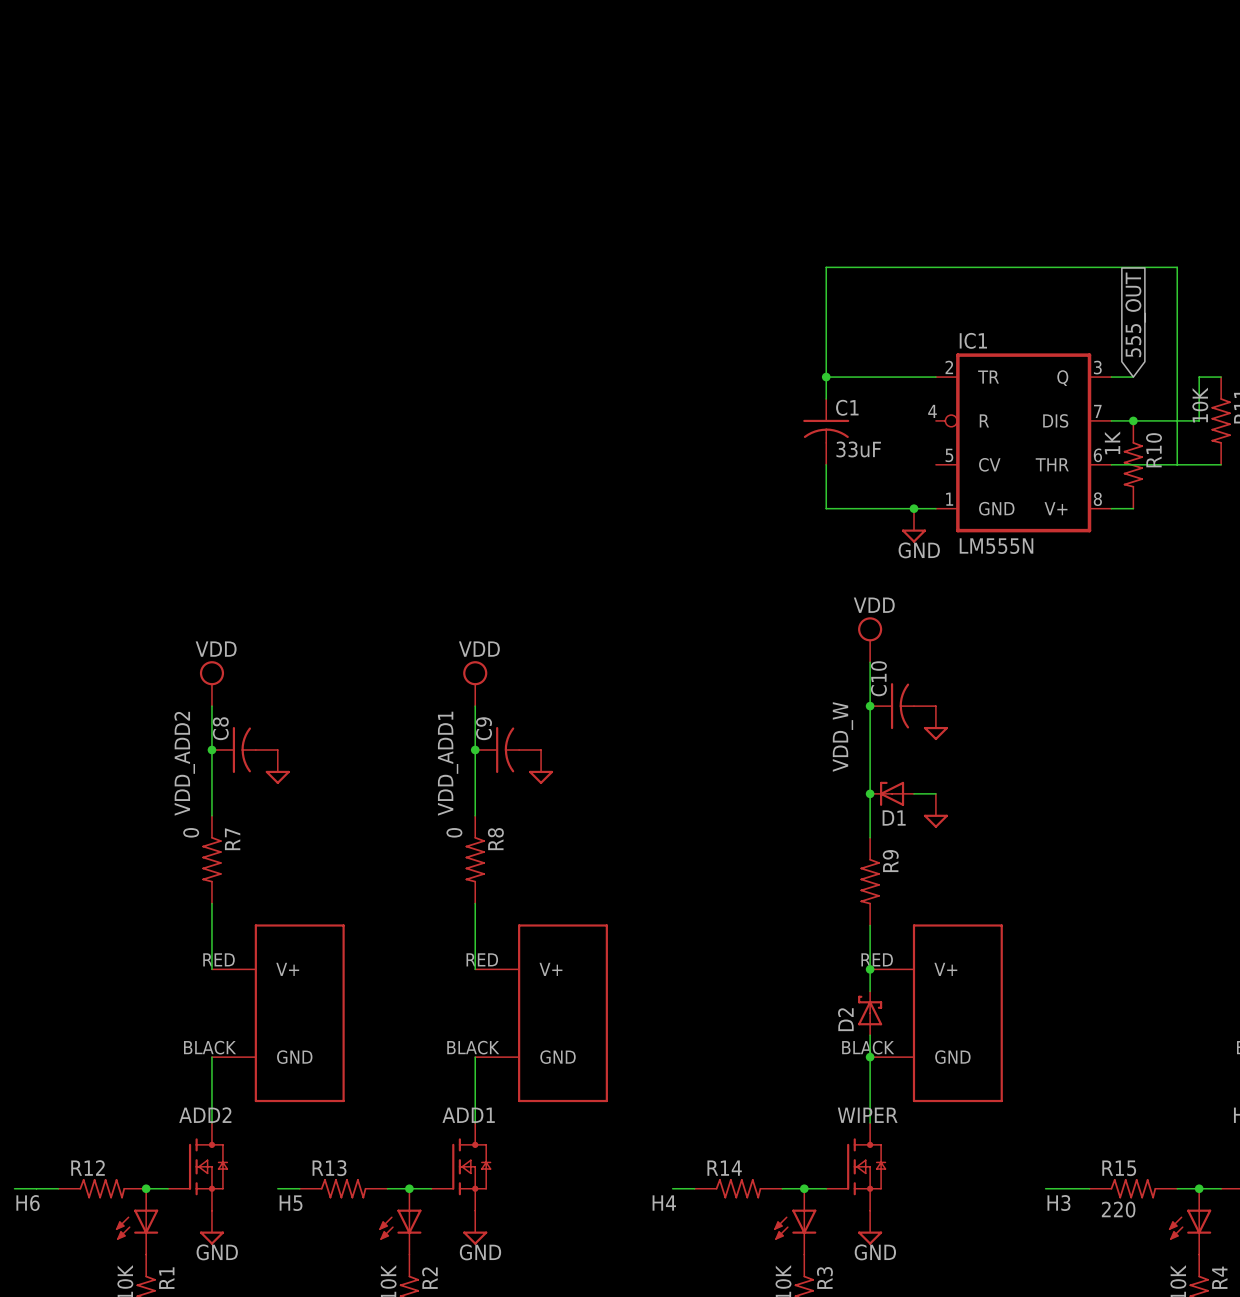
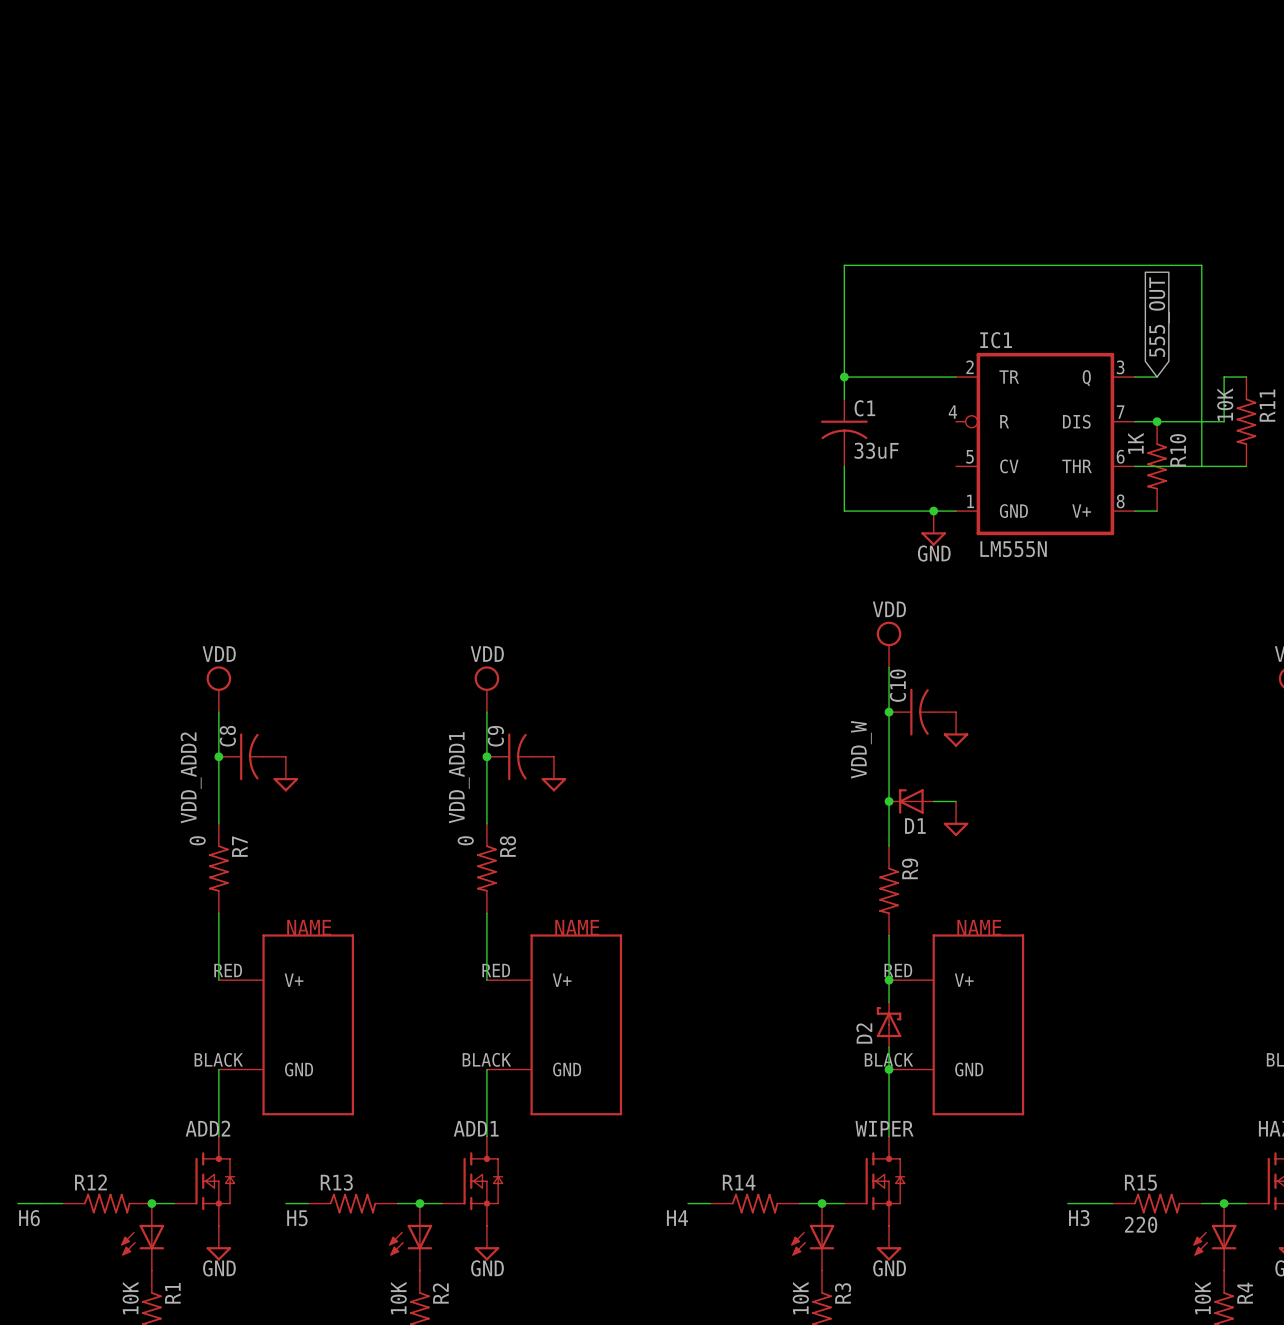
part text: none -> NAME (309, 927)
part text: none -> NAME (577, 927)
part text: none -> NAME (979, 927)

